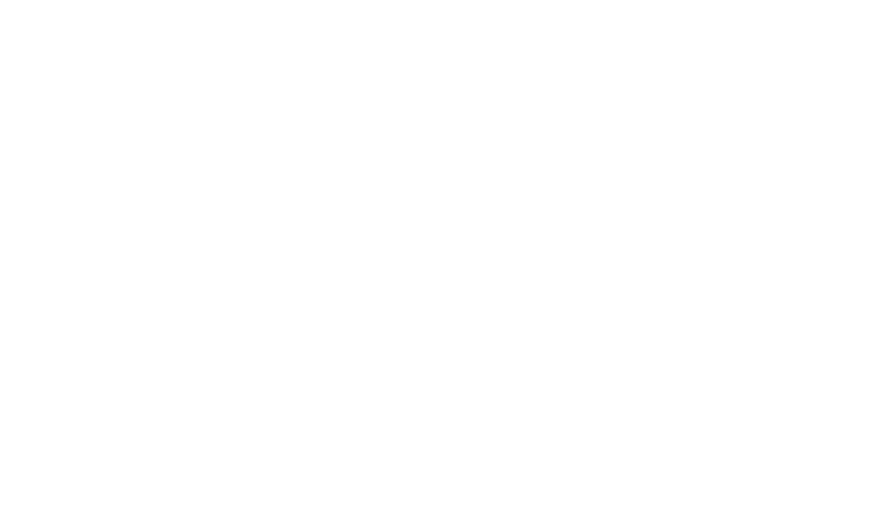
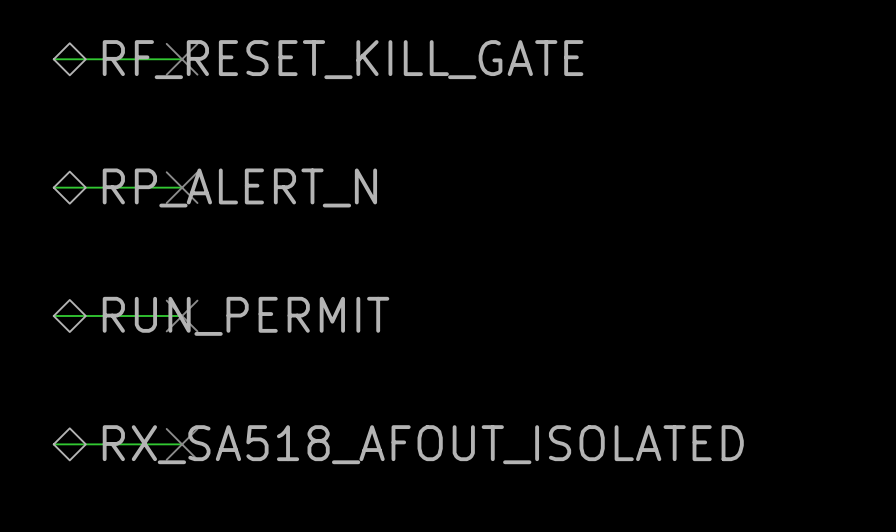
hierarchical label: none -> RF_RESET_KILL_GATE (343, 59)
wire: none -> (53, 59) (182, 59)
no-connect mark: none -> (182, 59)
hierarchical label: none -> RP_ALERT_N (239, 187)
wire: none -> (53, 187) (182, 187)
no-connect mark: none -> (182, 187)
hierarchical label: none -> RUN_PERMIT (246, 316)
wire: none -> (53, 316) (182, 316)
no-connect mark: none -> (182, 316)
hierarchical label: none -> RX_SA518_AFOUT_ISOLATED (423, 444)
wire: none -> (53, 444) (182, 444)
no-connect mark: none -> (182, 444)

